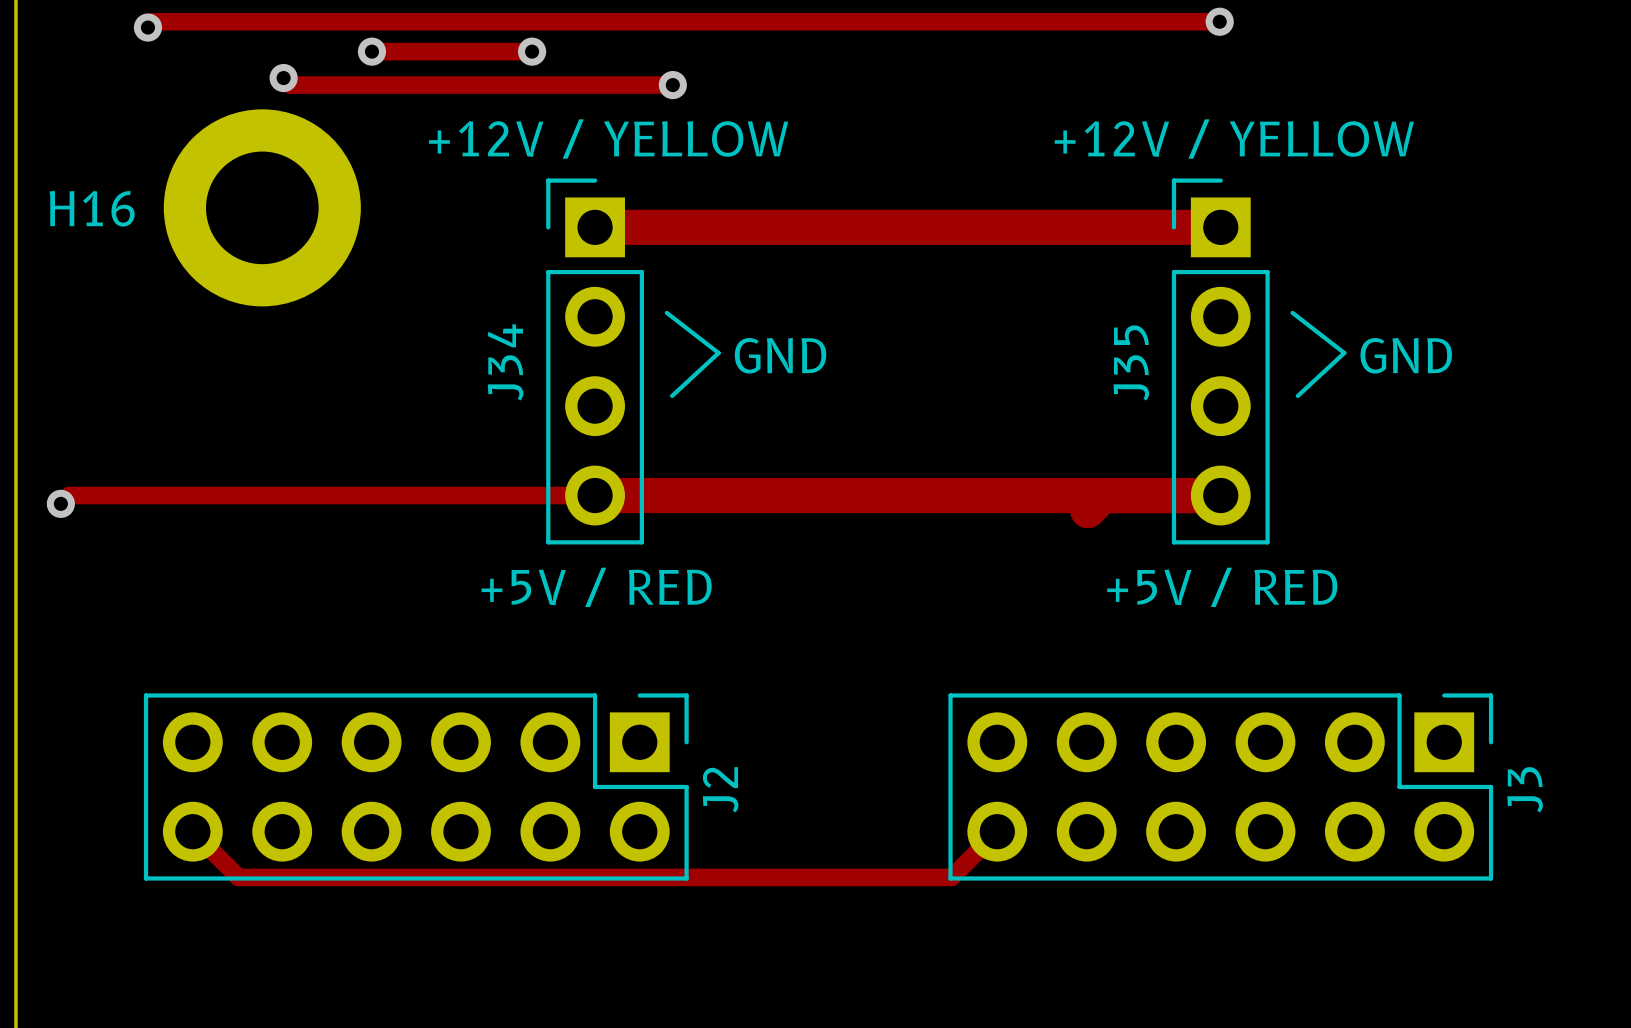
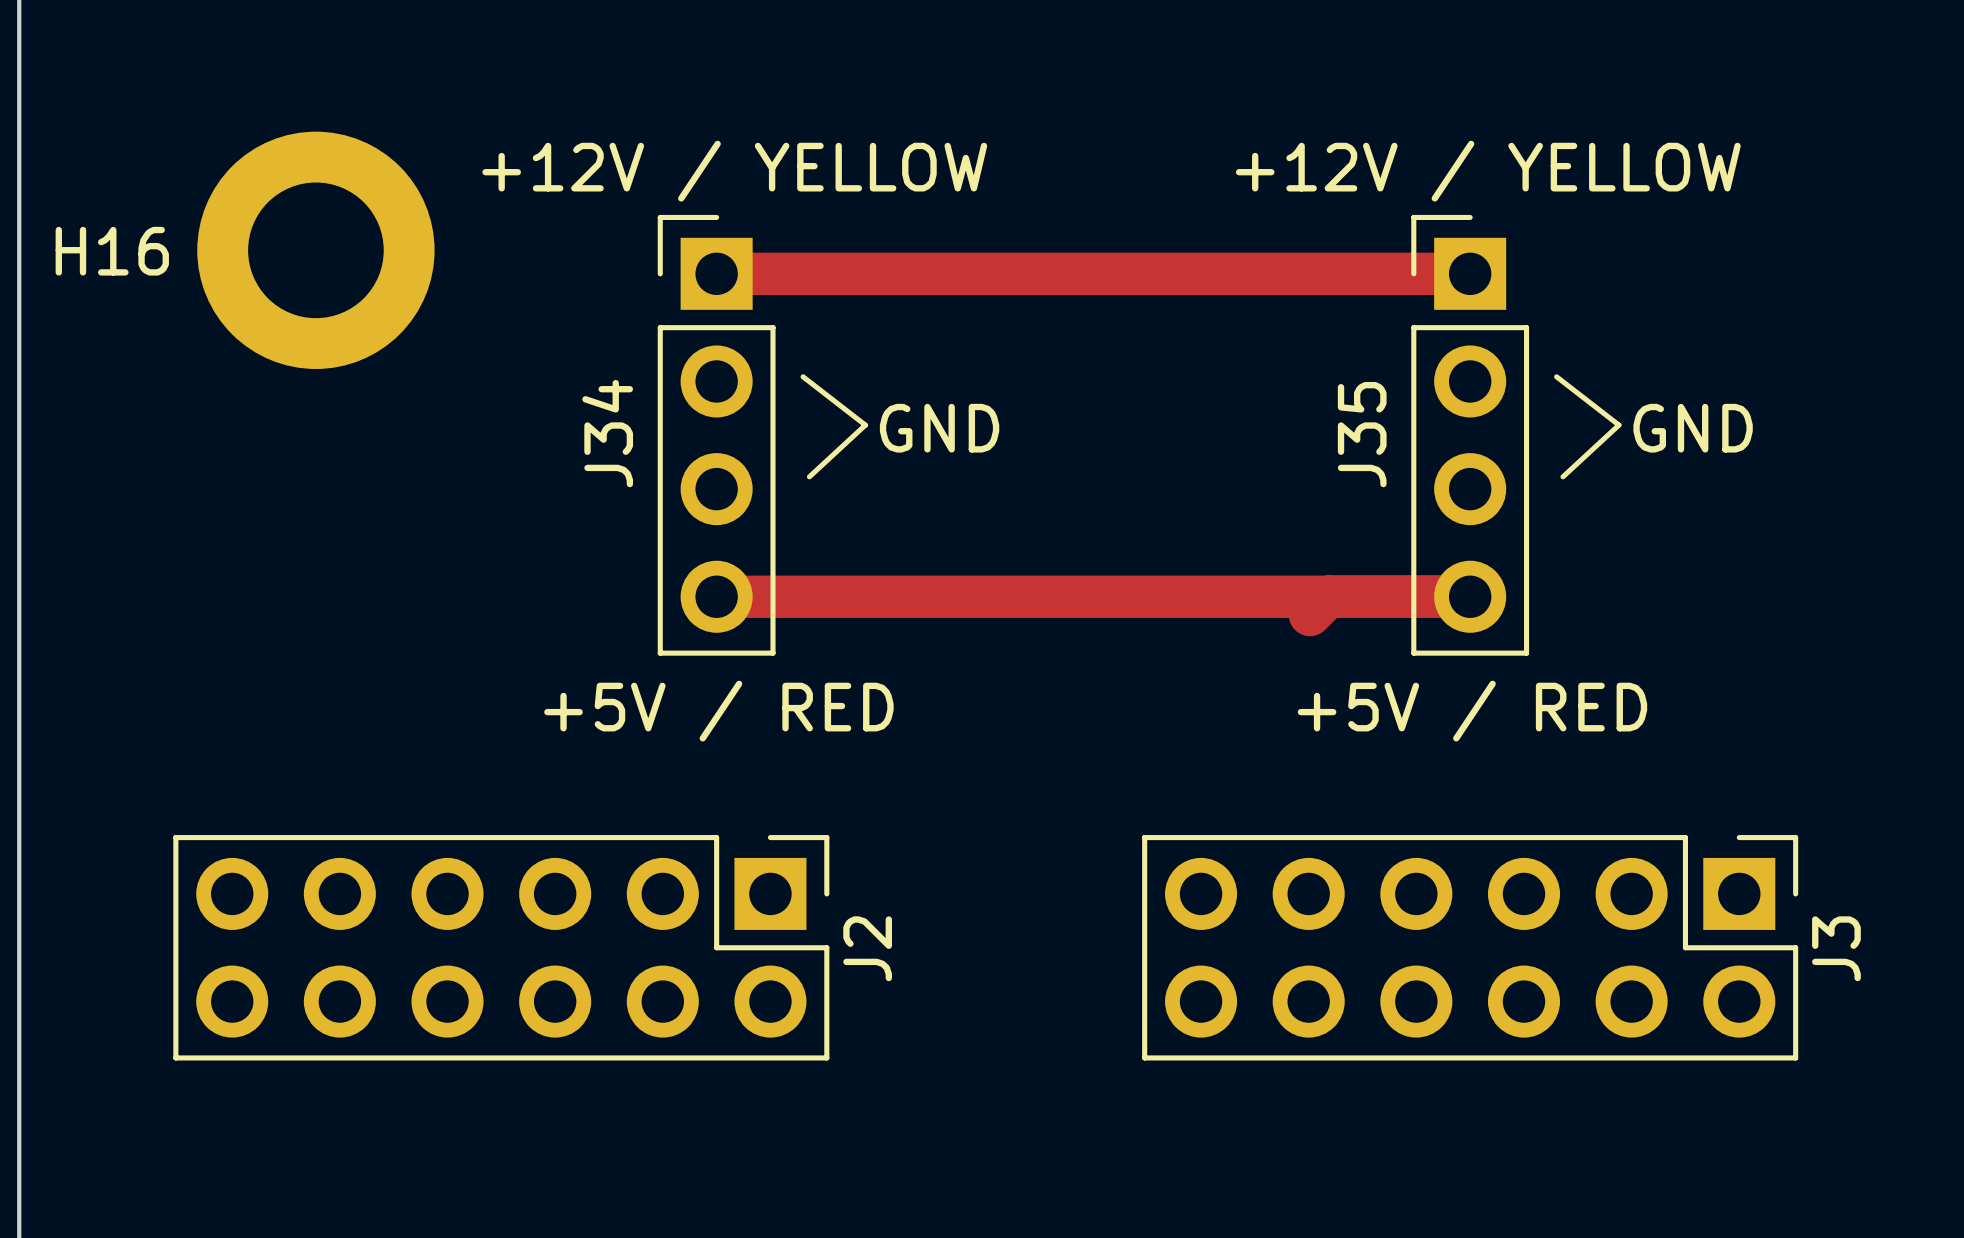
track: (1219, 21) (153, 21) (147, 27) -> none
via: (1219, 21) -> none
via: (147, 27) -> none
track: (371, 51) (532, 51) -> none
via: (371, 51) -> none
via: (532, 51) -> none
track: (283, 78) (290, 85) (672, 85) -> none
via: (283, 78) -> none
via: (672, 85) -> none
track: (595, 495) (69, 495) (60, 503) -> none
via: (60, 503) -> none
track: (192, 831) (238, 877) (951, 877) (997, 831) -> none

